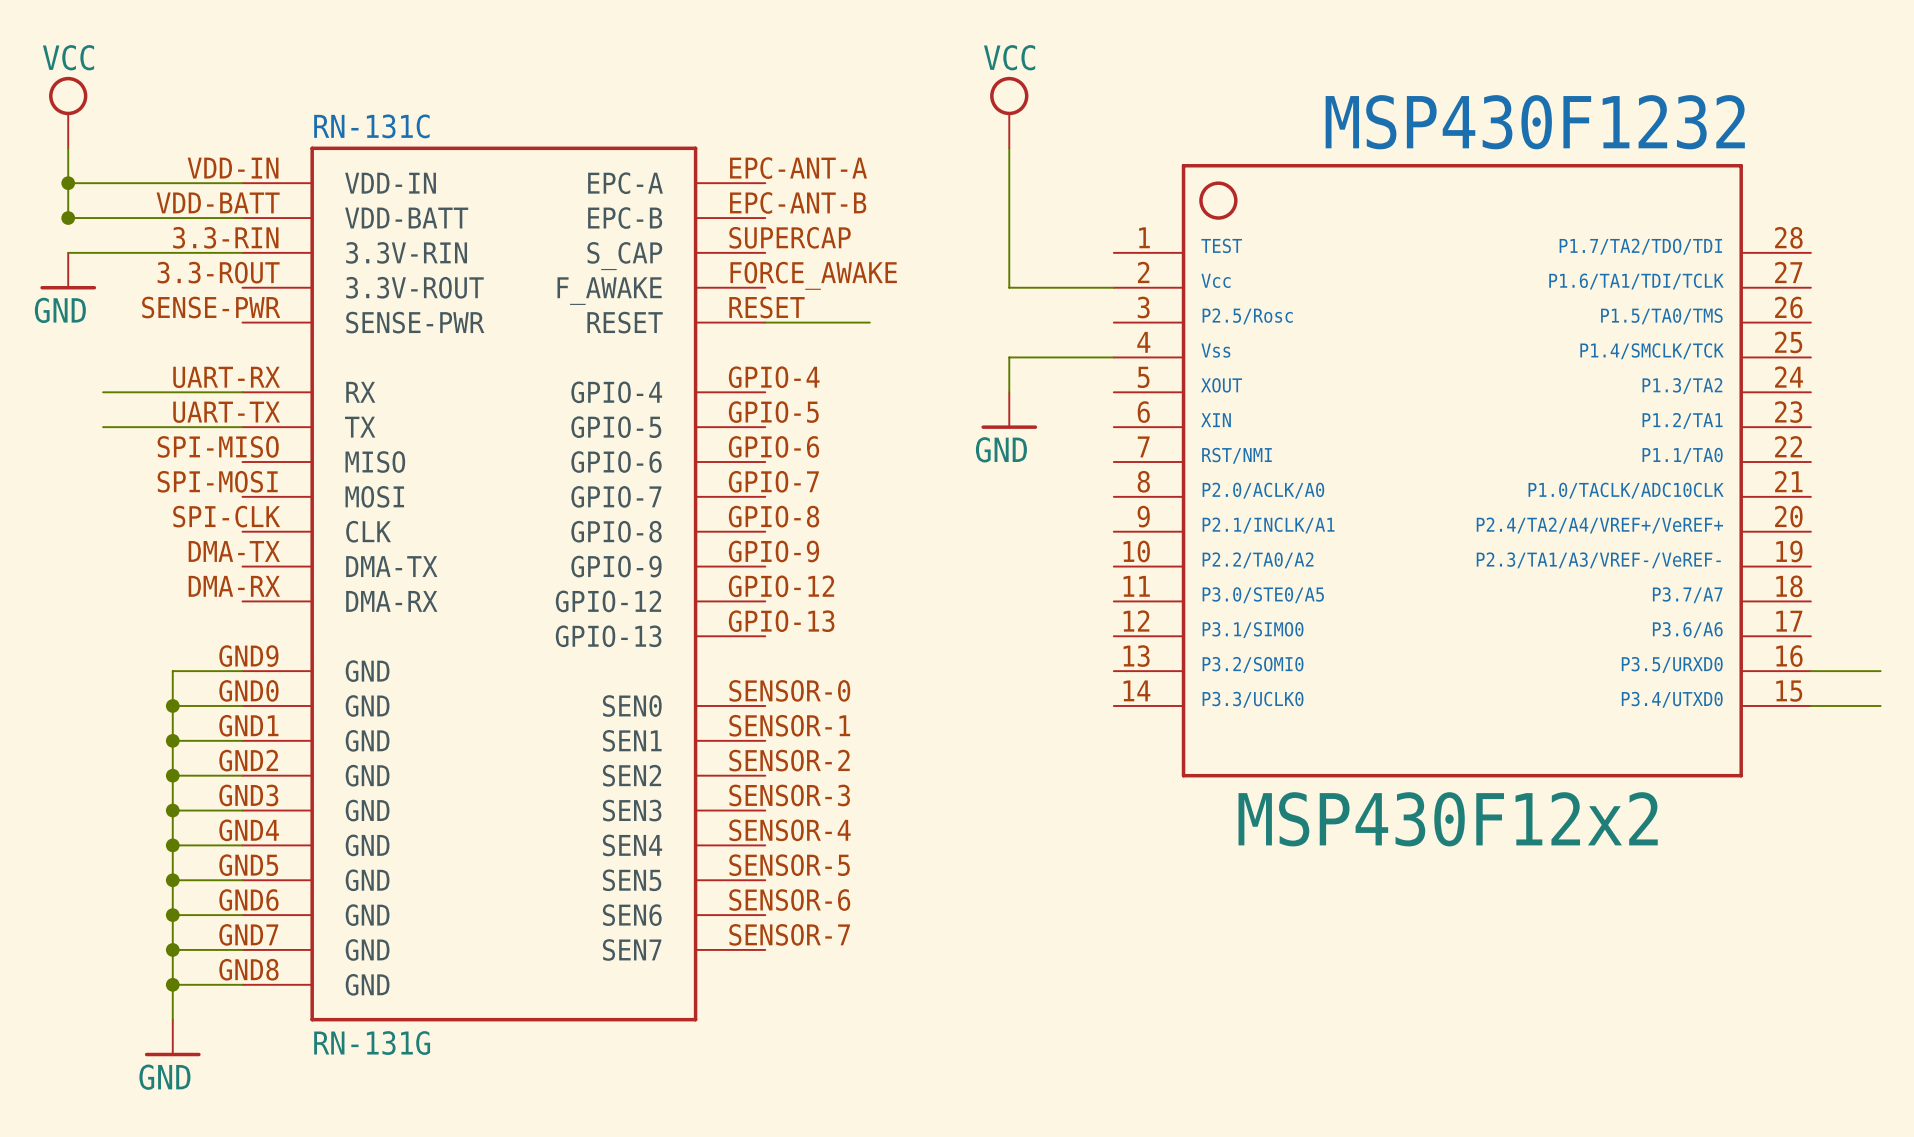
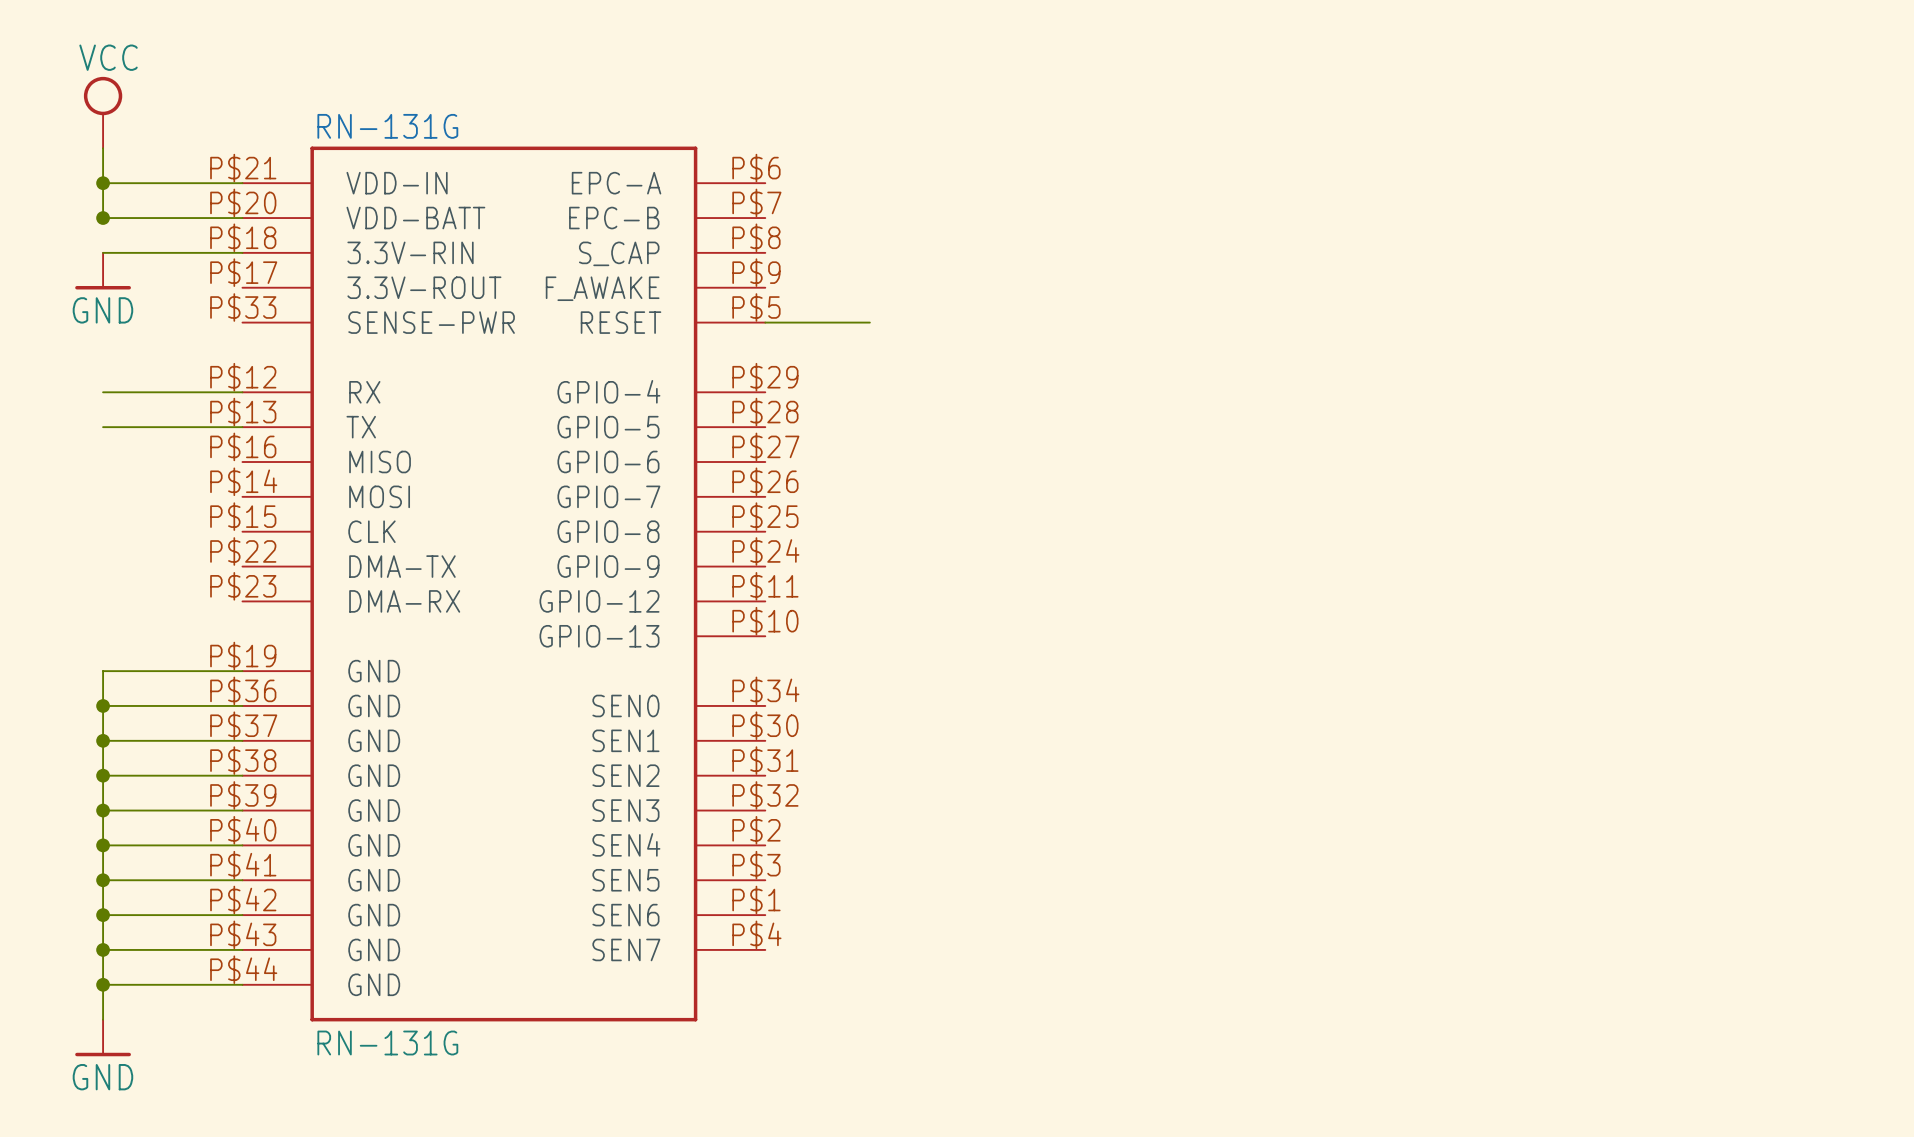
power symbol position: VCC (68, 112) -> VCC (103, 112)
power symbol: VCC (1009, 112) -> none
RN-131C name: RN-131C (371, 126) -> RN-131G (387, 126)
RN-131C symbol: [242, 146, 766, 1022] -> [242, 146, 766, 1022]
wire: (68, 148) (68, 218) (103, 218) -> (103, 148) (103, 218)
wire: (1009, 148) (1009, 287) (1113, 287) -> none
wire: (68, 183) (103, 183) -> none
junction: (68, 183) -> none
junction: none -> (103, 183)
junction: (68, 218) -> none
junction: none -> (103, 218)
wire: (68, 252) (103, 252) -> none
power symbol position: GND (68, 271) -> GND (103, 271)
wire: (1113, 357) (1009, 357) (1009, 392) -> none
power symbol: GND (1009, 410) -> none
MSP430F1232: (1462, 470) -> none
wire: (172, 671) (172, 1019) -> (172, 671) (103, 671) (103, 1019)
wire: (1810, 671) (1880, 671) -> none
wire: none -> (103, 705) (172, 705)
junction: none -> (103, 705)
junction: (172, 705) -> none
wire: (1810, 705) (1880, 705) -> none
wire: none -> (103, 740) (172, 740)
junction: none -> (103, 740)
junction: (172, 740) -> none
wire: none -> (103, 775) (172, 775)
junction: none -> (103, 775)
junction: (172, 775) -> none
wire: none -> (103, 810) (172, 810)
junction: none -> (103, 810)
junction: (172, 810) -> none
wire: none -> (103, 845) (172, 845)
junction: none -> (103, 845)
junction: (172, 845) -> none
wire: none -> (103, 880) (172, 880)
junction: none -> (103, 880)
junction: (172, 880) -> none
wire: none -> (103, 915) (172, 915)
junction: none -> (103, 915)
junction: (172, 915) -> none
wire: none -> (103, 949) (172, 949)
junction: none -> (103, 949)
junction: (172, 949) -> none
wire: none -> (103, 984) (172, 984)
junction: none -> (103, 984)
junction: (172, 984) -> none
power symbol position: GND (172, 1037) -> GND (103, 1037)

